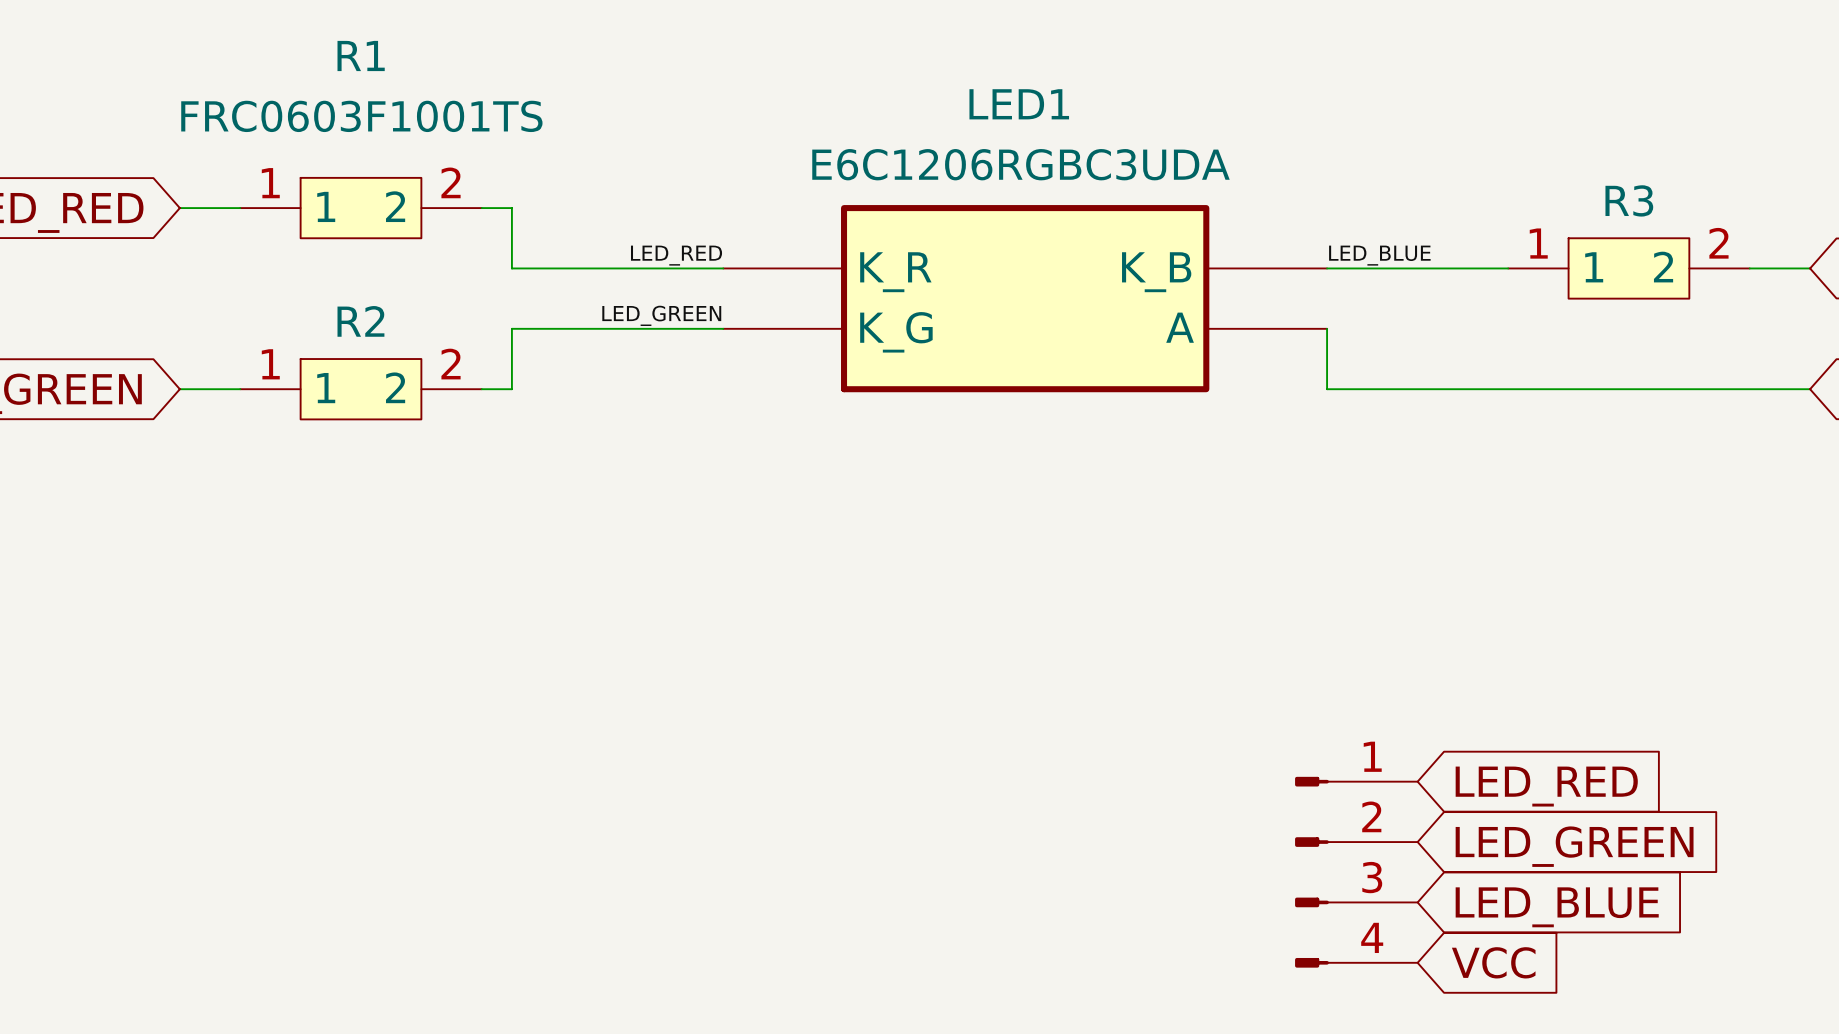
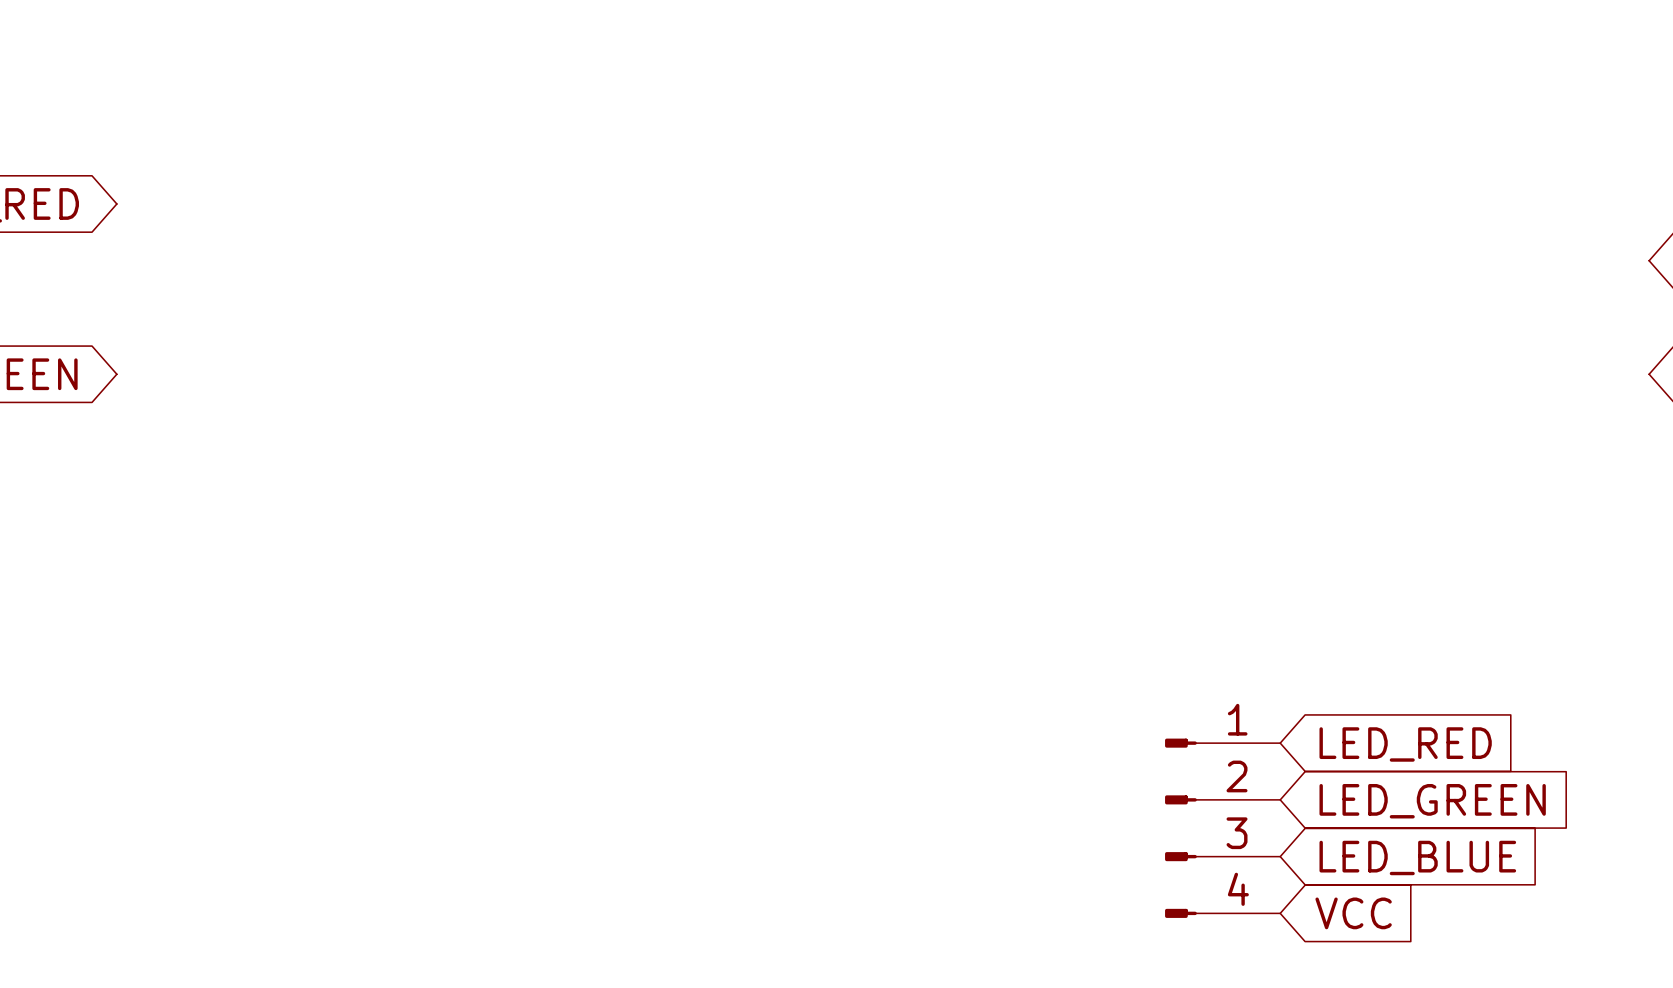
wire: (179, 208) (240, 208) -> none
R1: FRC0603F1001TS (360, 208) -> none
wire: (481, 208) (511, 208) (511, 268) (723, 268) -> none
label: LED_RED (676, 255) -> none
label: LED_BLUE (1379, 255) -> none
wire: (1327, 268) (1508, 268) -> none
R3: (1628, 268) -> none
wire: (1749, 268) (1810, 268) -> none
LED1: E6C1206RGBC3UDA (1025, 298) -> none
label: LED_GREEN (661, 315) -> none
wire: (723, 328) (511, 328) (511, 389) (481, 389) -> none
wire: (1327, 328) (1327, 389) (1810, 389) -> none
wire: (179, 389) (240, 389) -> none
R2: (360, 389) -> none

